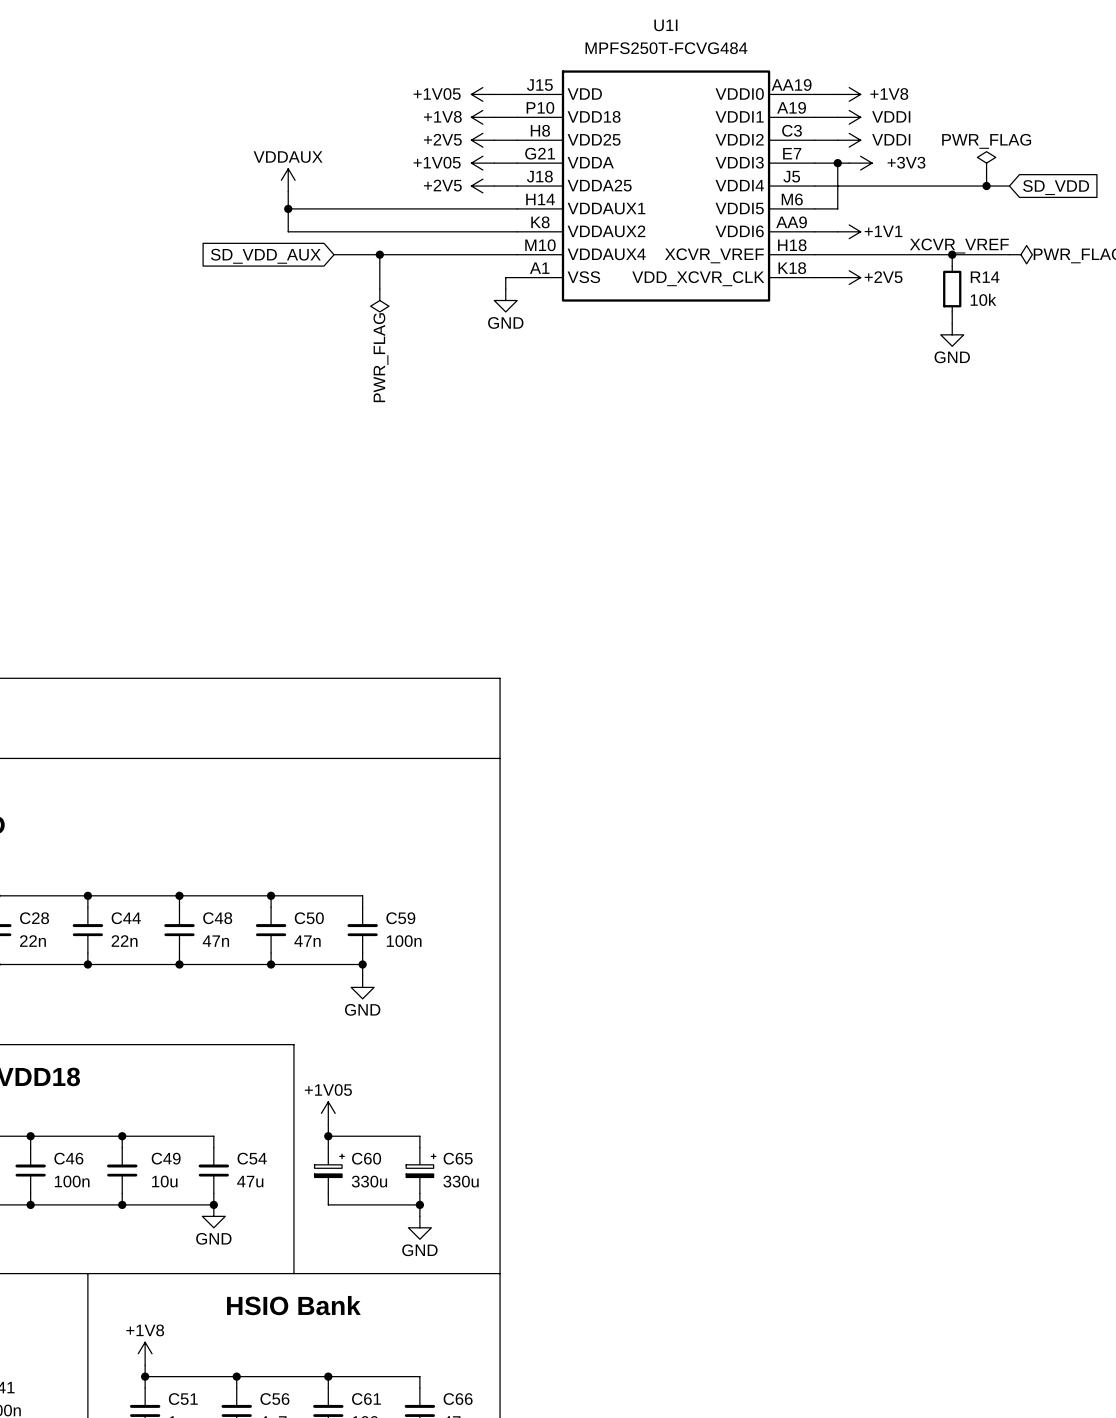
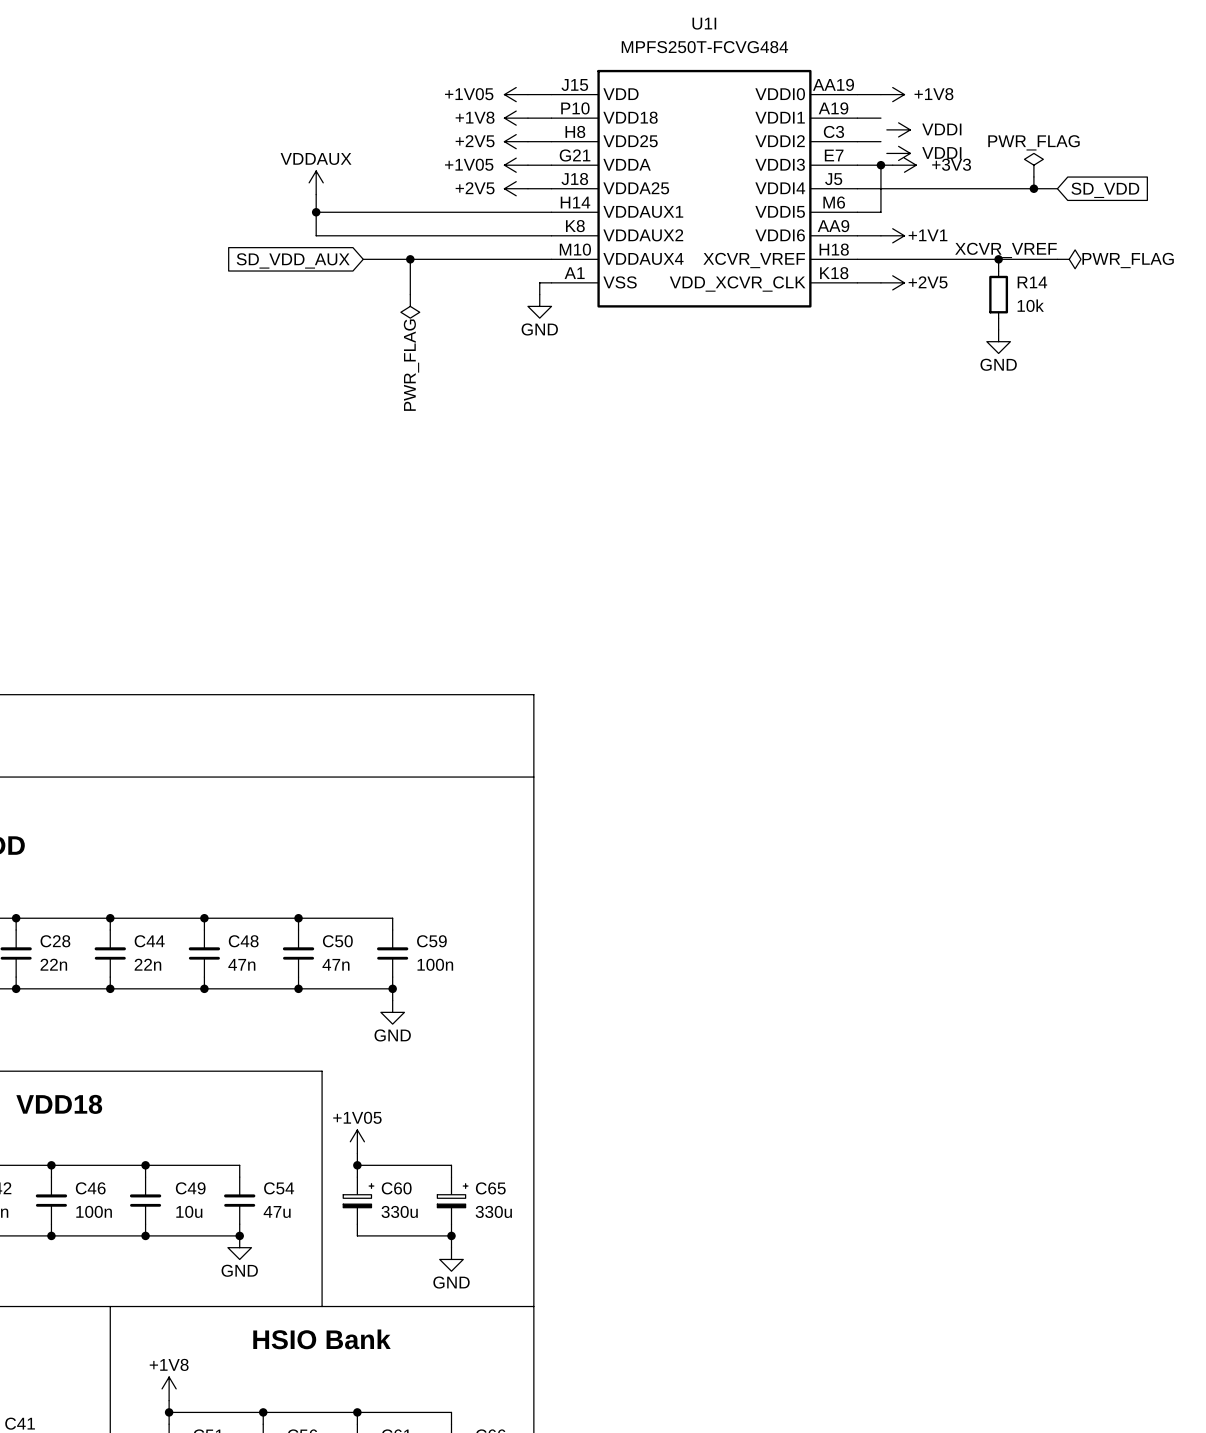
power symbol: VDDI (849, 117) -> none
power symbol: none -> VDDI (898, 129)
power symbol: VDDI (849, 140) -> none
power symbol: none -> VDDI (898, 153)

